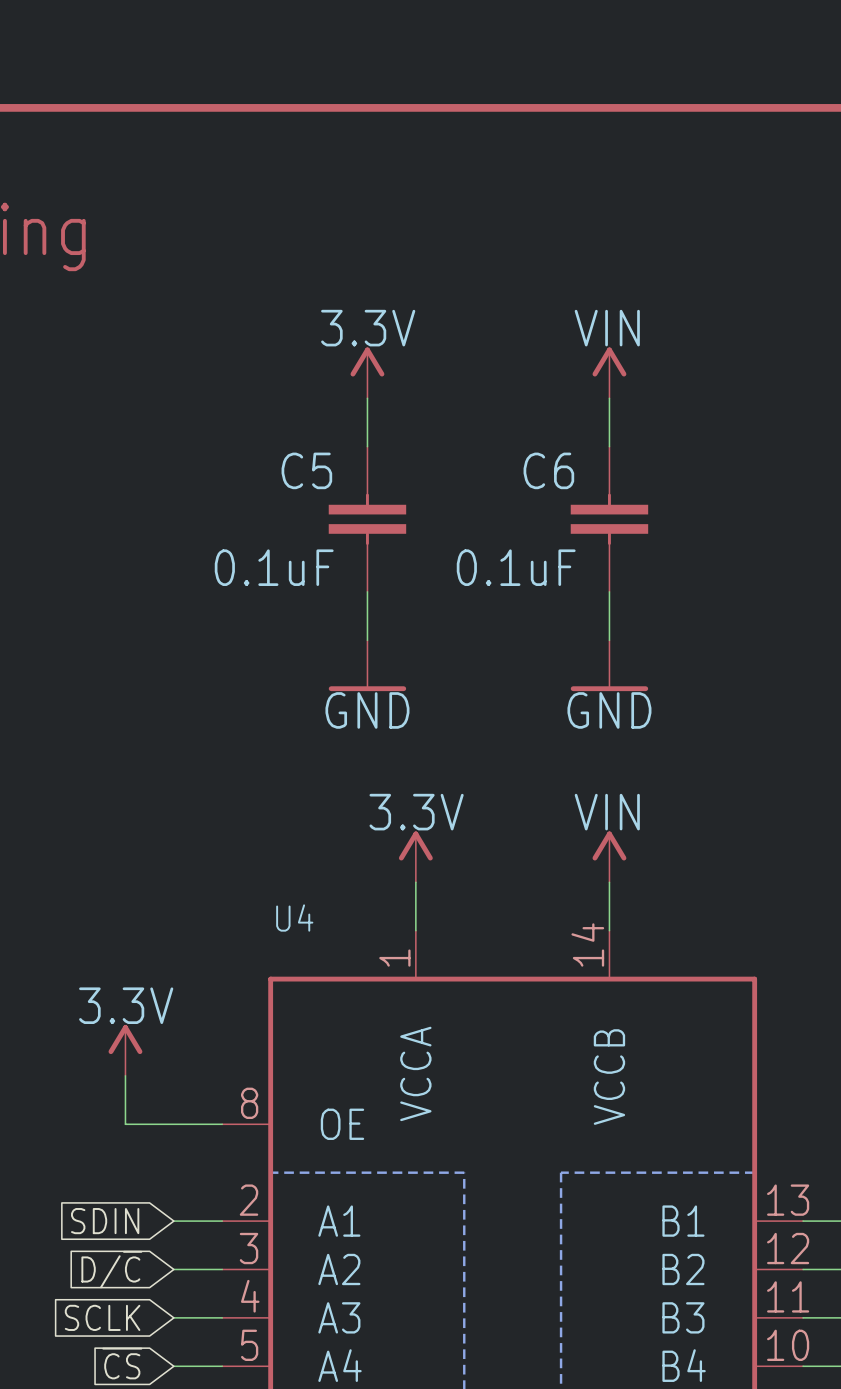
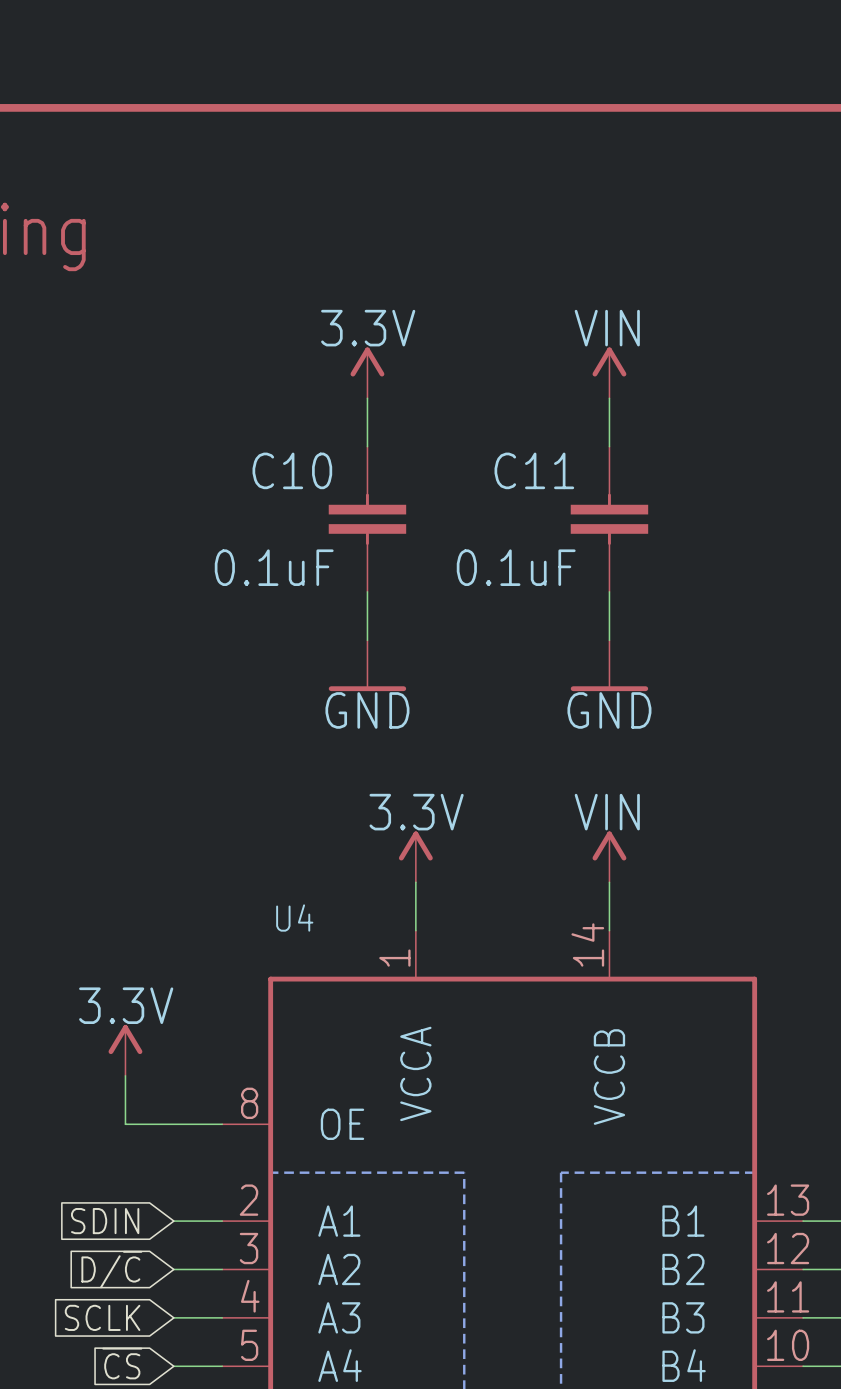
C5 name: C5 (306, 470) -> C10 (292, 470)
C6 name: C6 (548, 470) -> C11 (534, 470)

